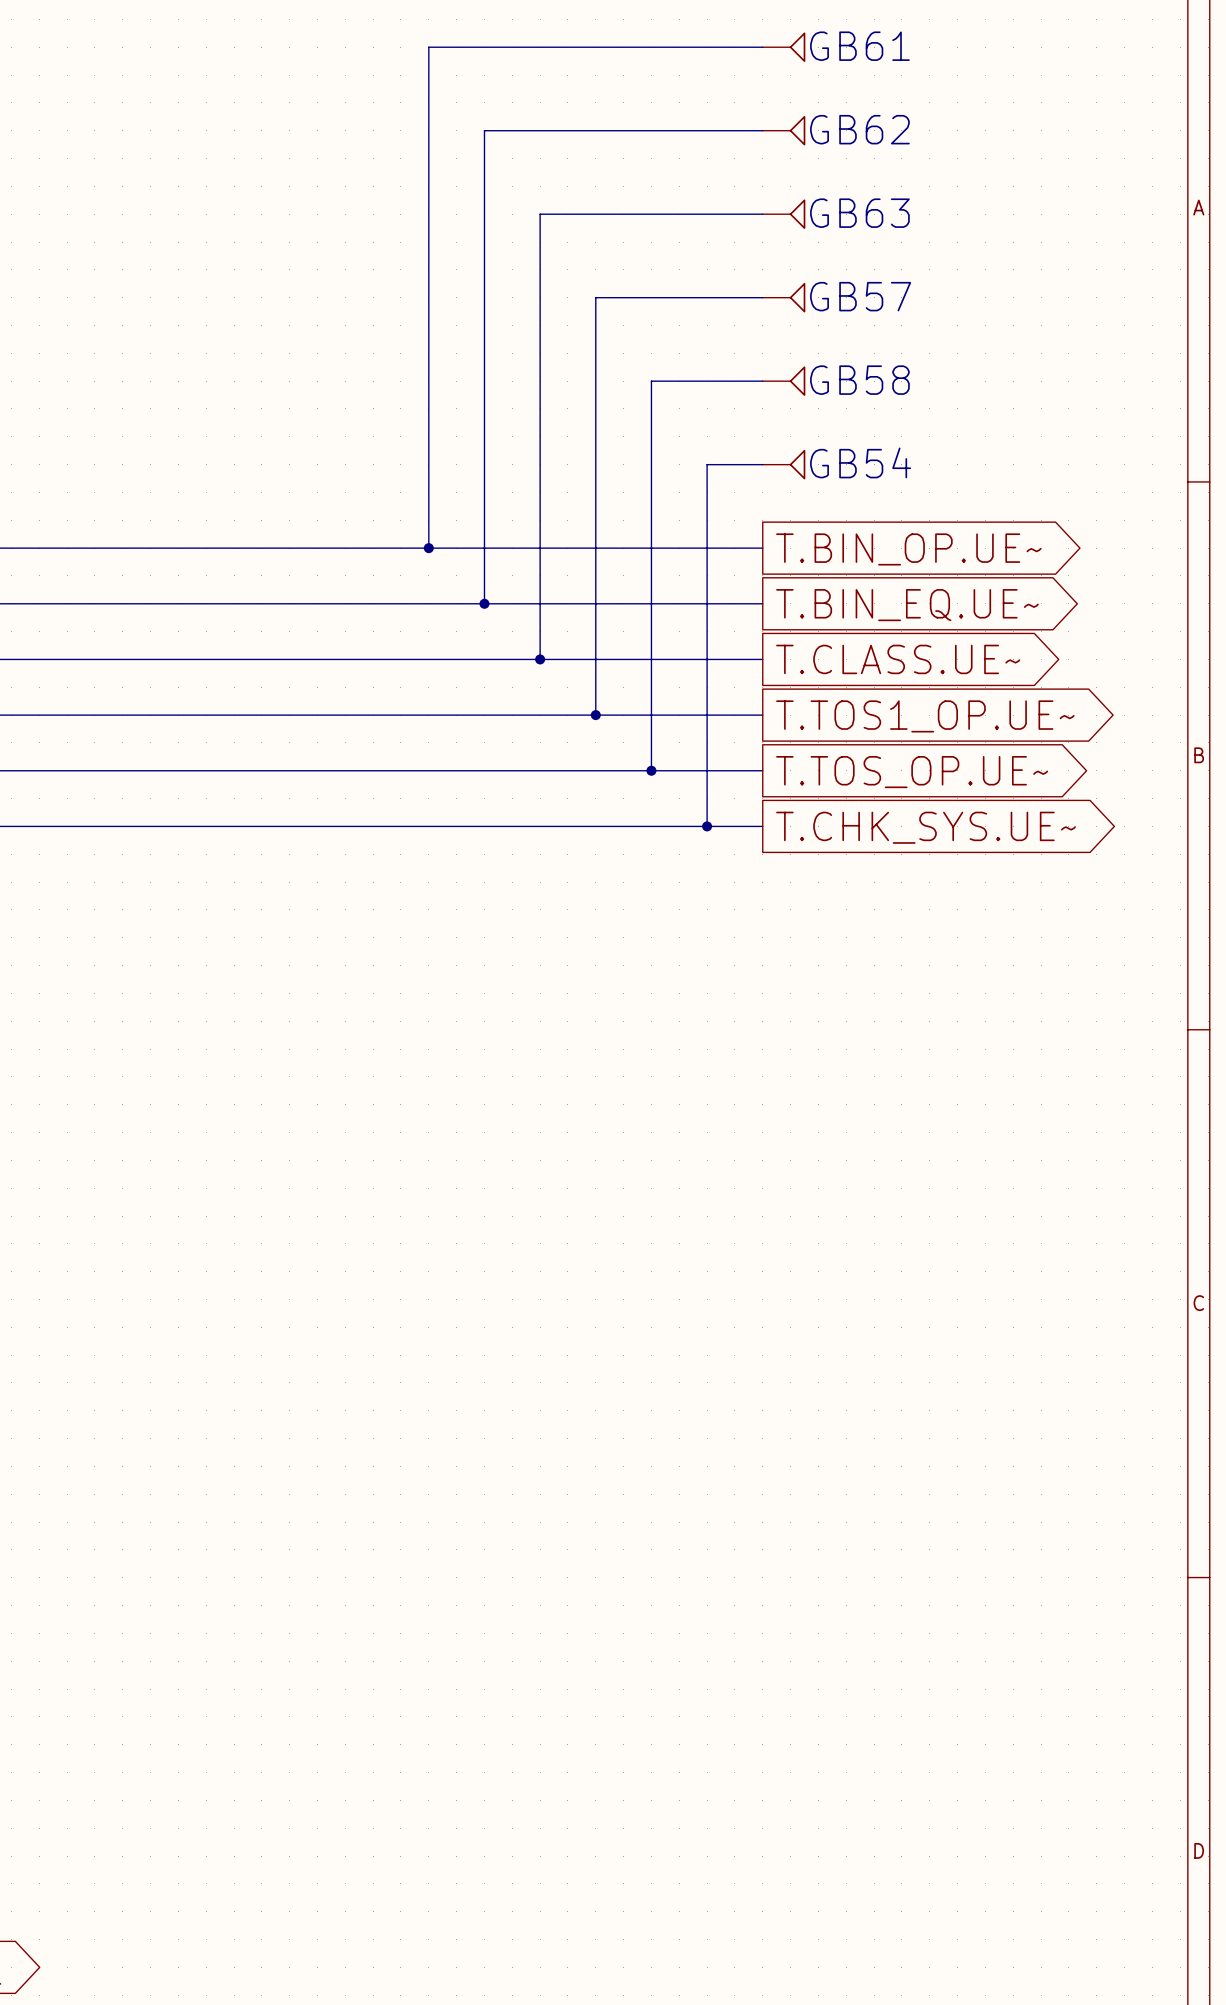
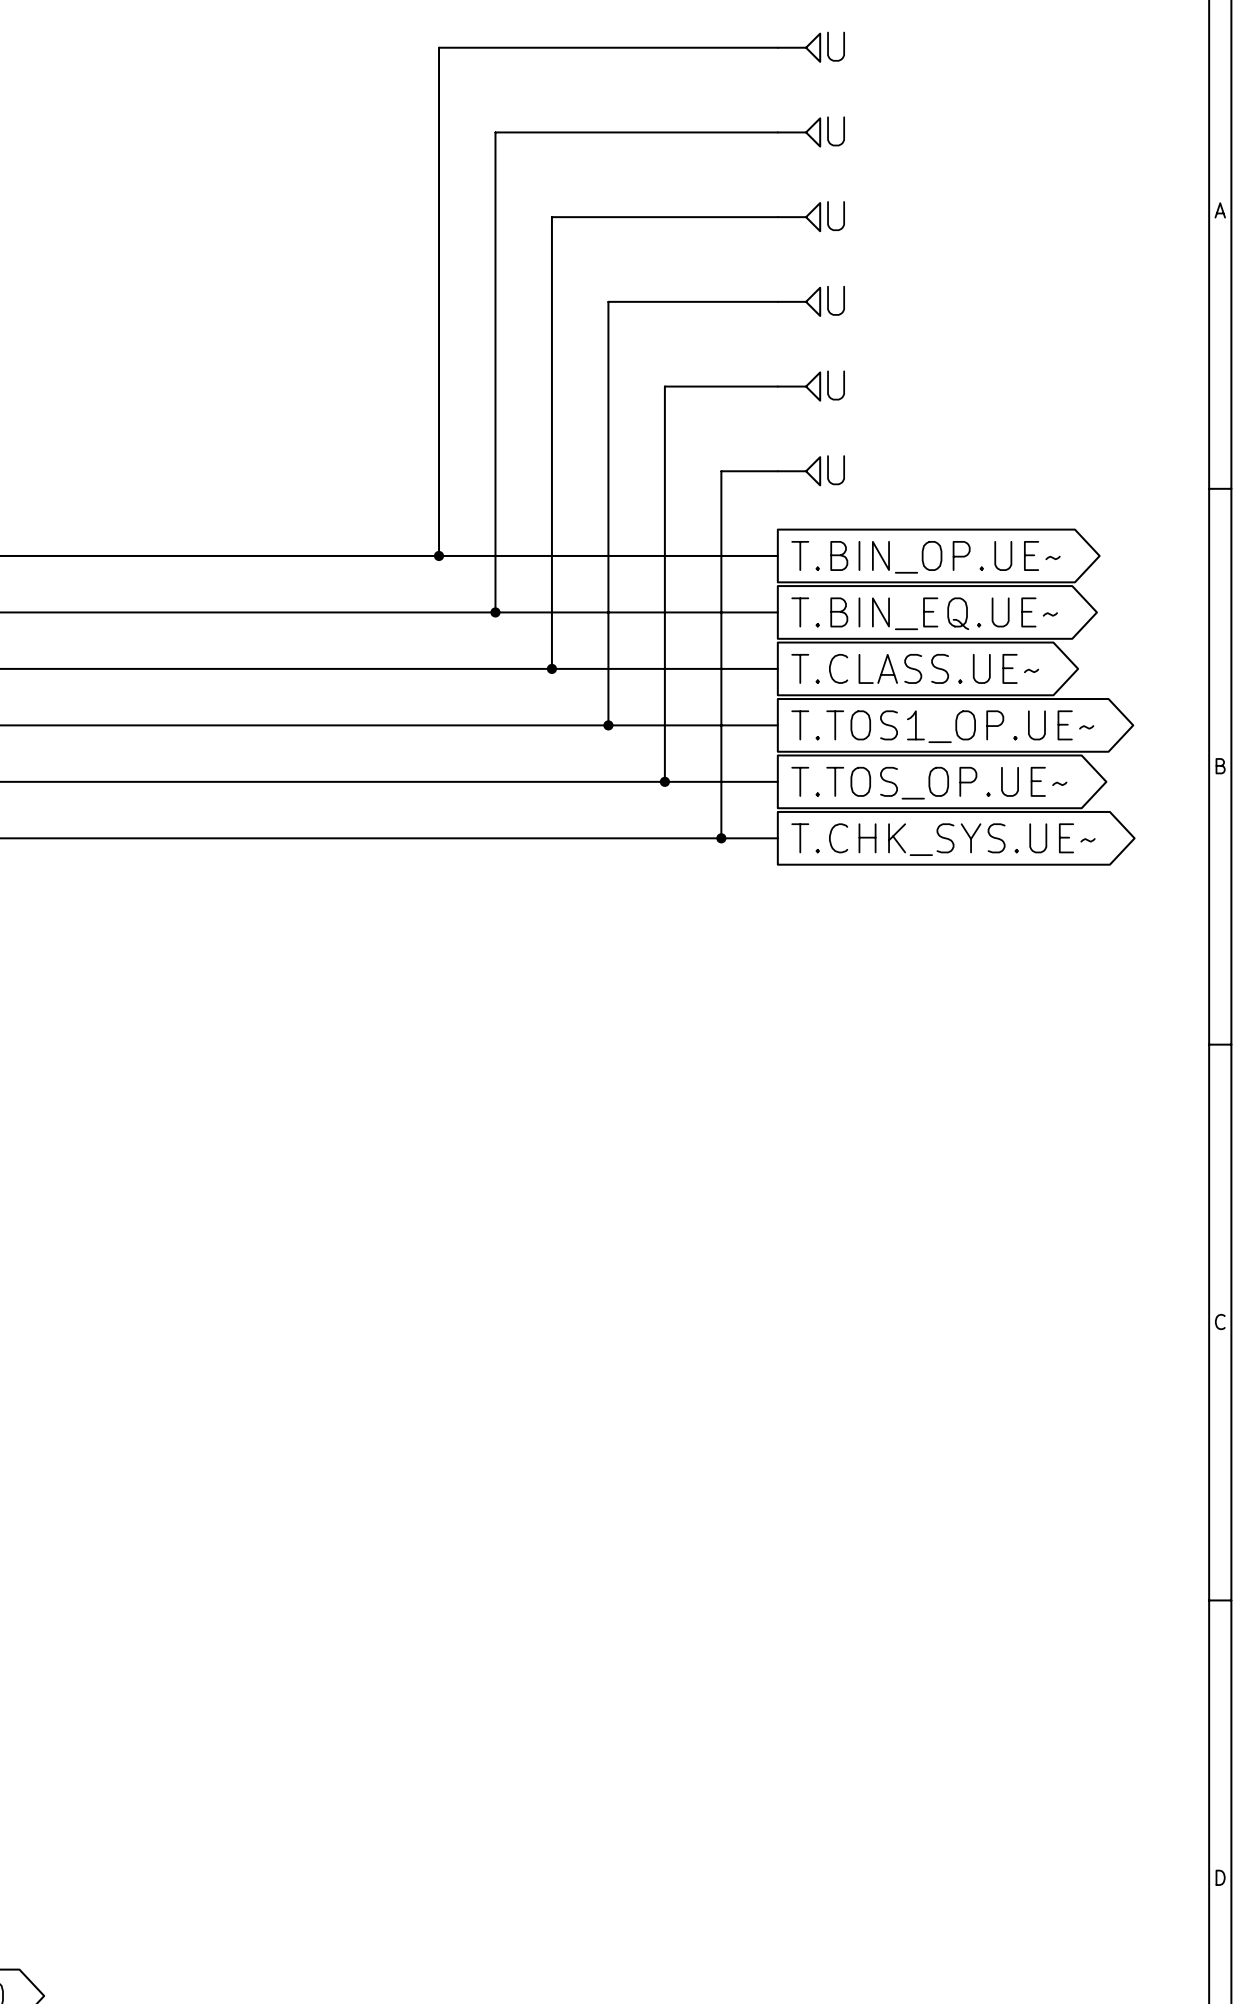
GB61 name: GB61 (859, 46) -> U (836, 46)
GB62 name: GB62 (859, 129) -> U (836, 131)
GB63 name: GB63 (859, 213) -> U (836, 216)
GB57 name: GB57 (860, 296) -> U (836, 300)
GB58 name: GB58 (859, 380) -> U (836, 385)
GB54 name: GB54 (860, 462) -> U (836, 470)

